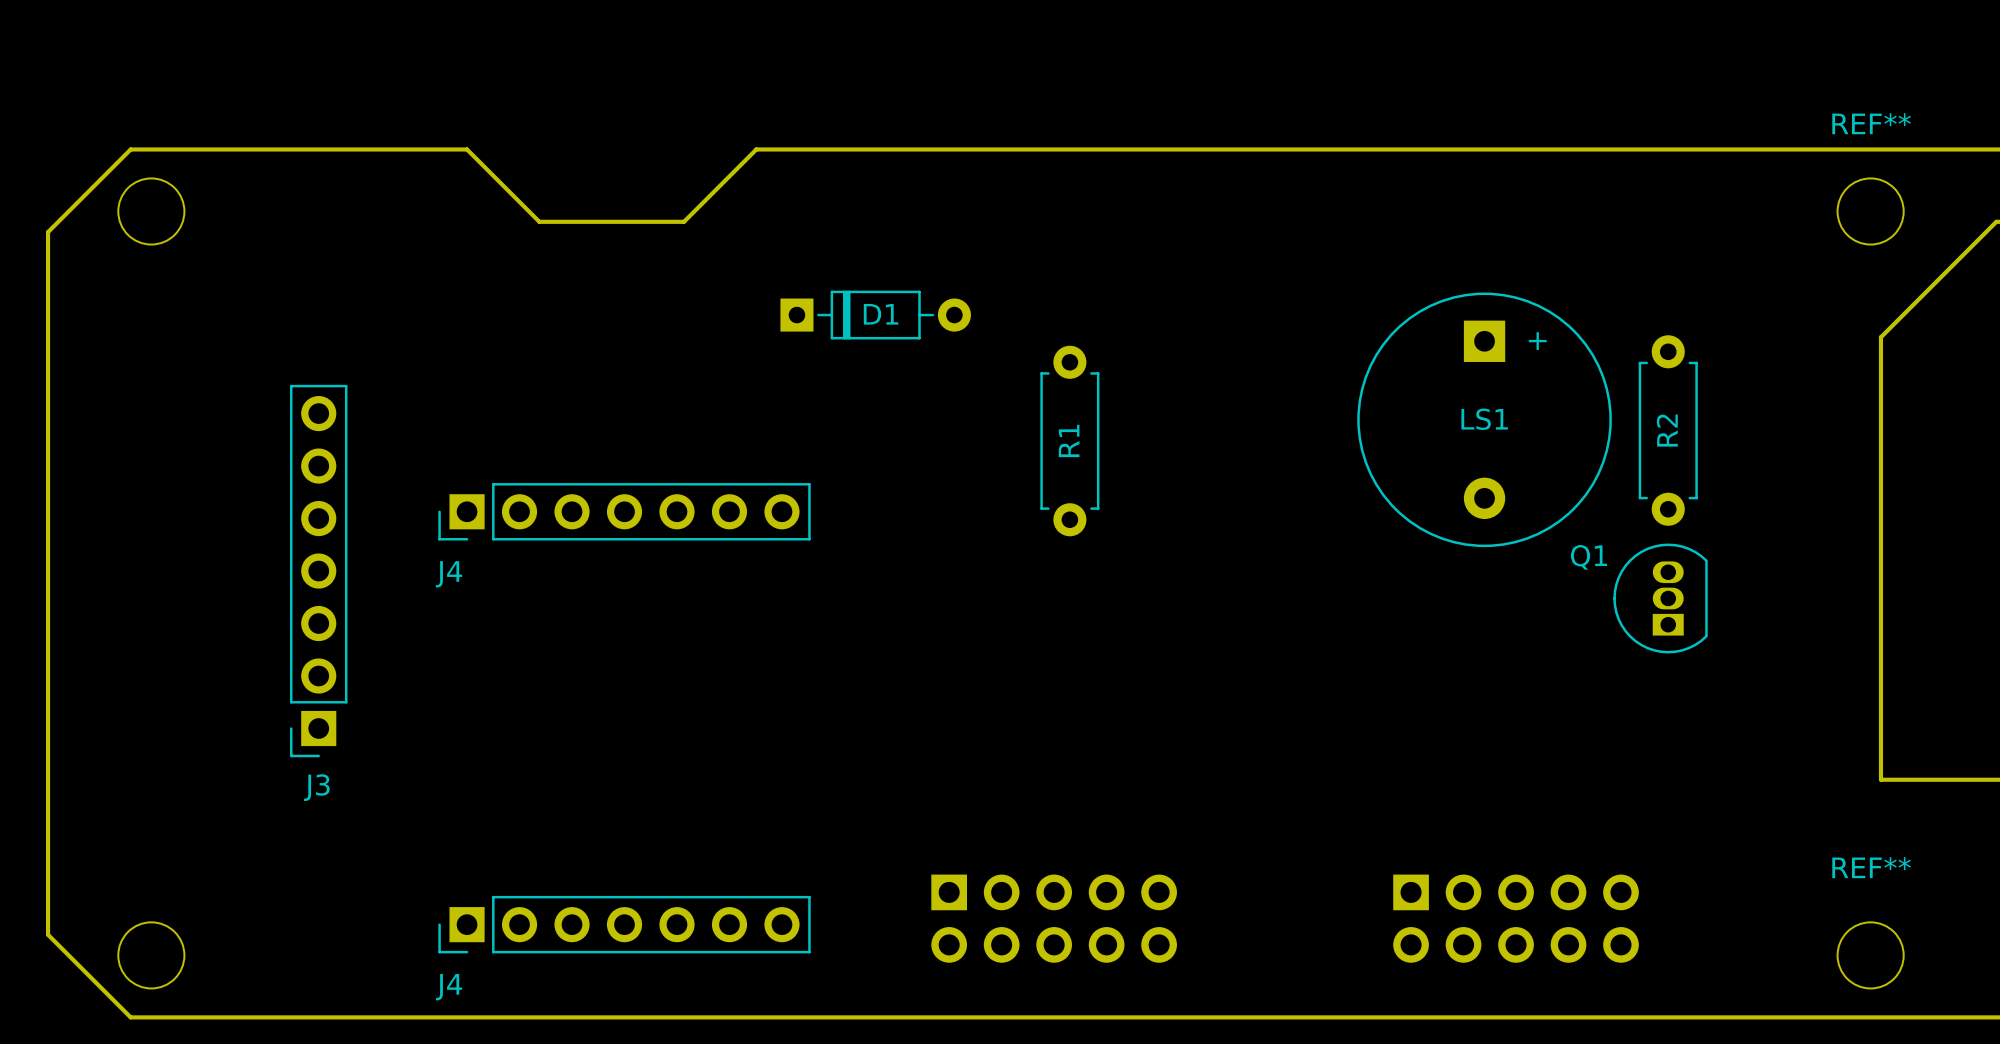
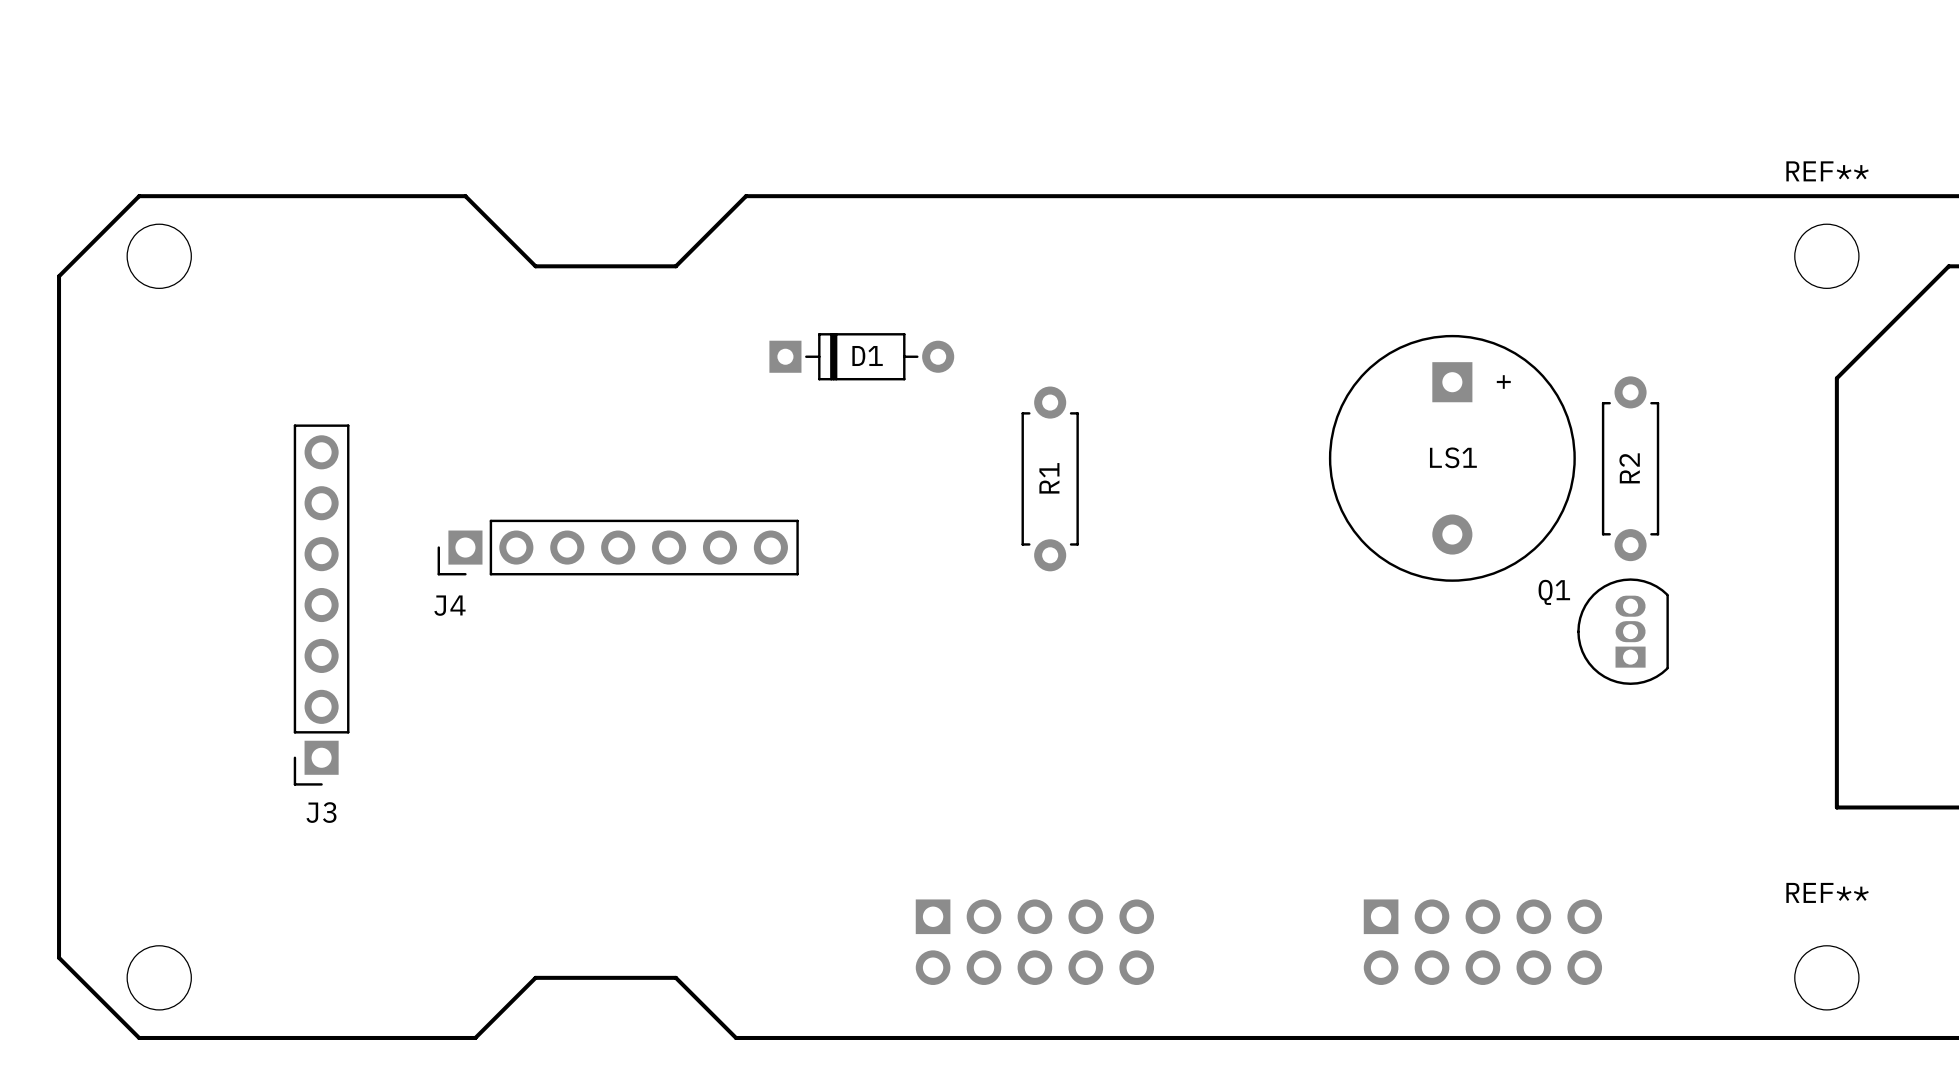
J4: (624, 924) -> none
board edge: (477, 1017) (746, 1017) -> (475, 1037) (535, 977) (675, 977) (736, 1037)

